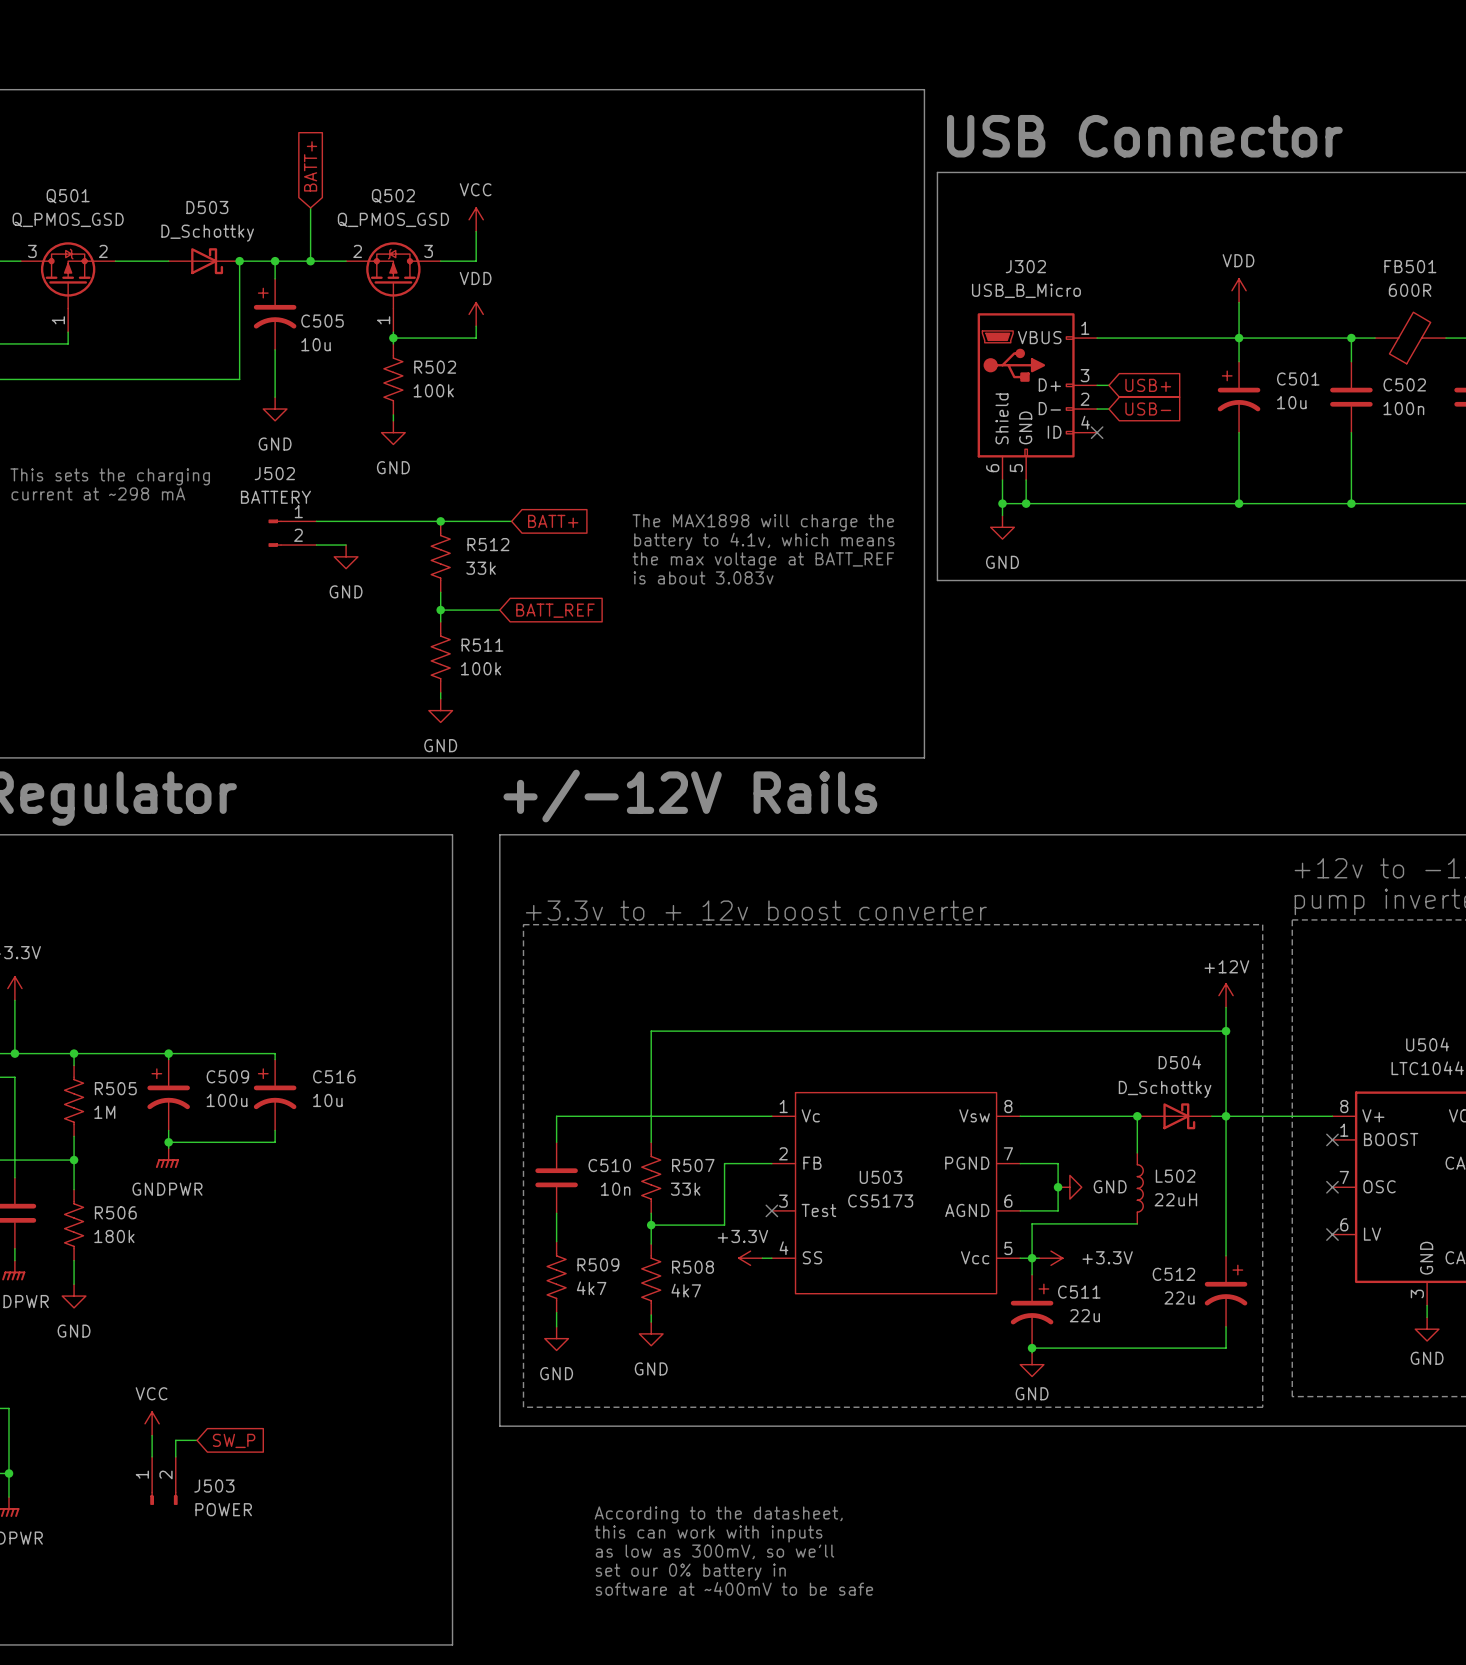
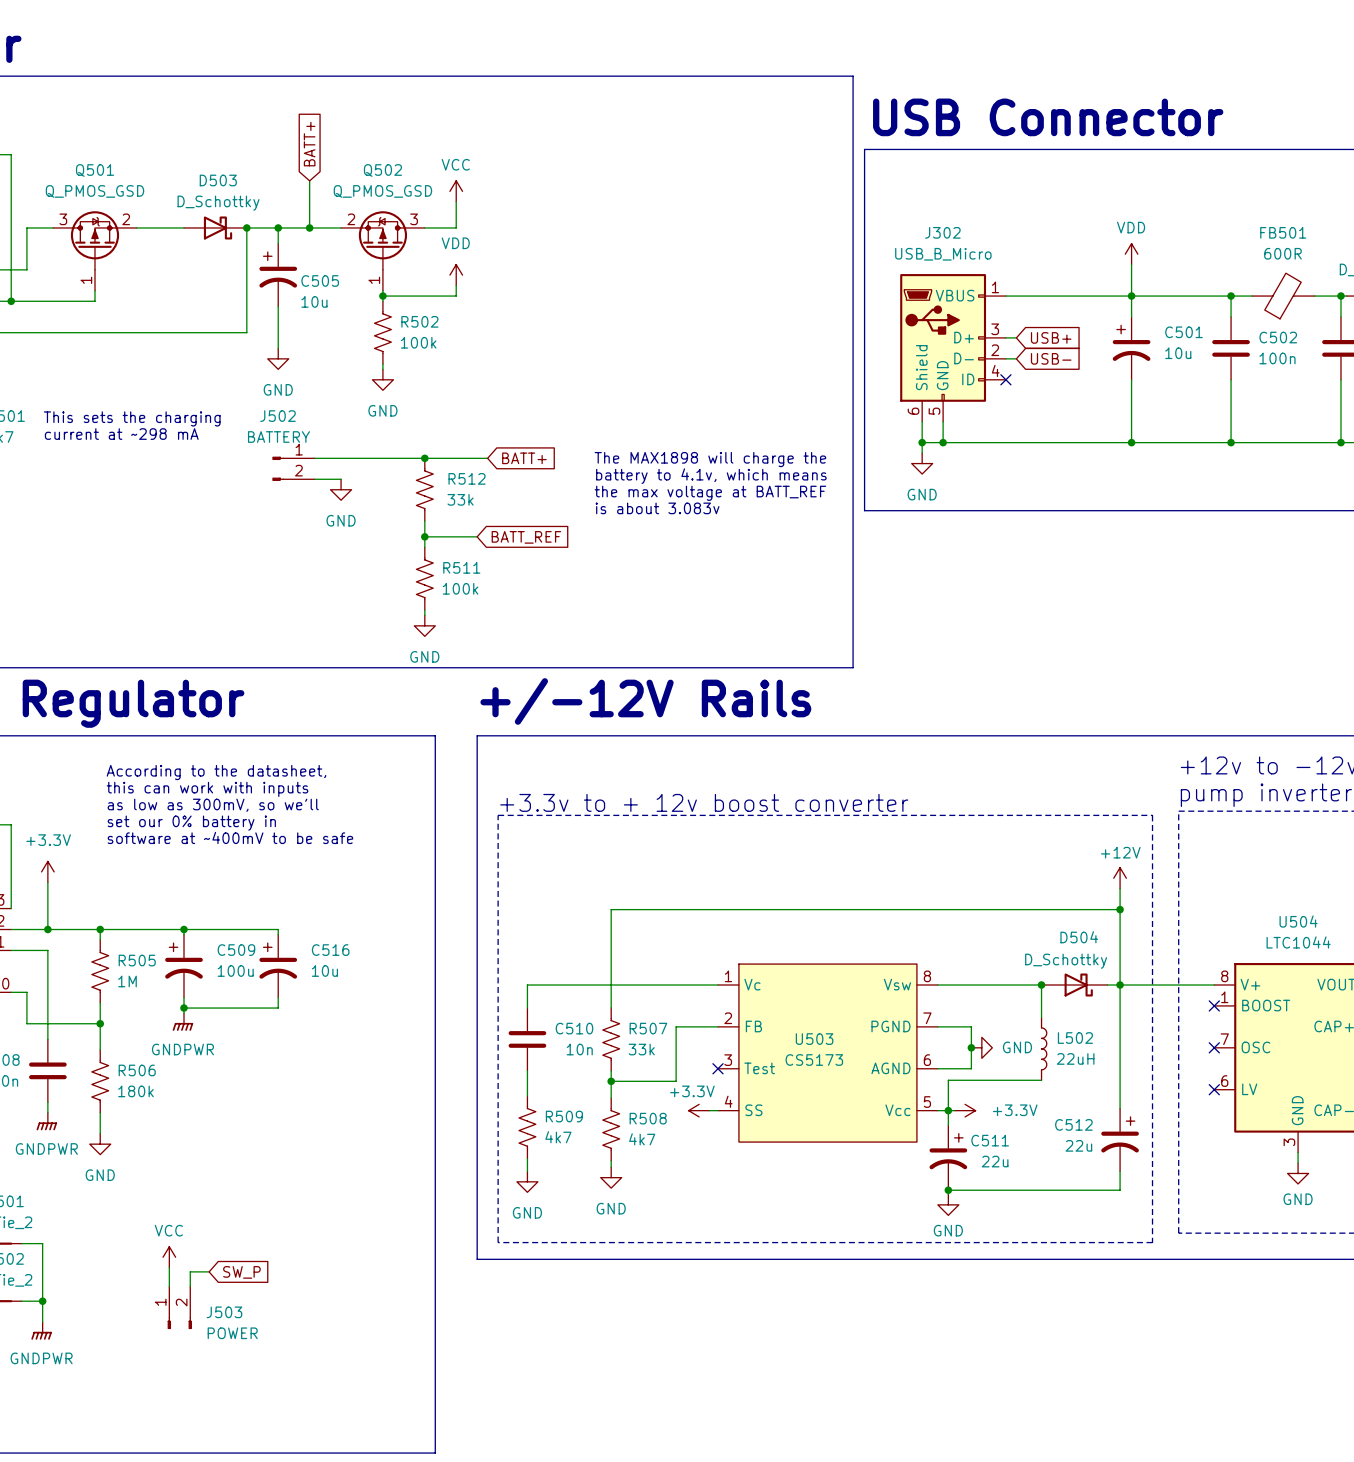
text: none -> According to the datasheet, (216, 772)
text: none -> this can work with inputs (207, 789)
text: none -> as low as 300mV, so we'll (213, 805)
text: none -> set our 0% battery in (191, 823)
text: none -> software at ~400mV to be safe (230, 837)
text: According to the datasheet, (718, 1514) -> none
text: this can work with inputs (708, 1534) -> none
text: as low as 300mV, so we'll (715, 1551) -> none
text: set our 0% battery in (690, 1572) -> none
text: software at ~400mV to be safe (734, 1588) -> none

